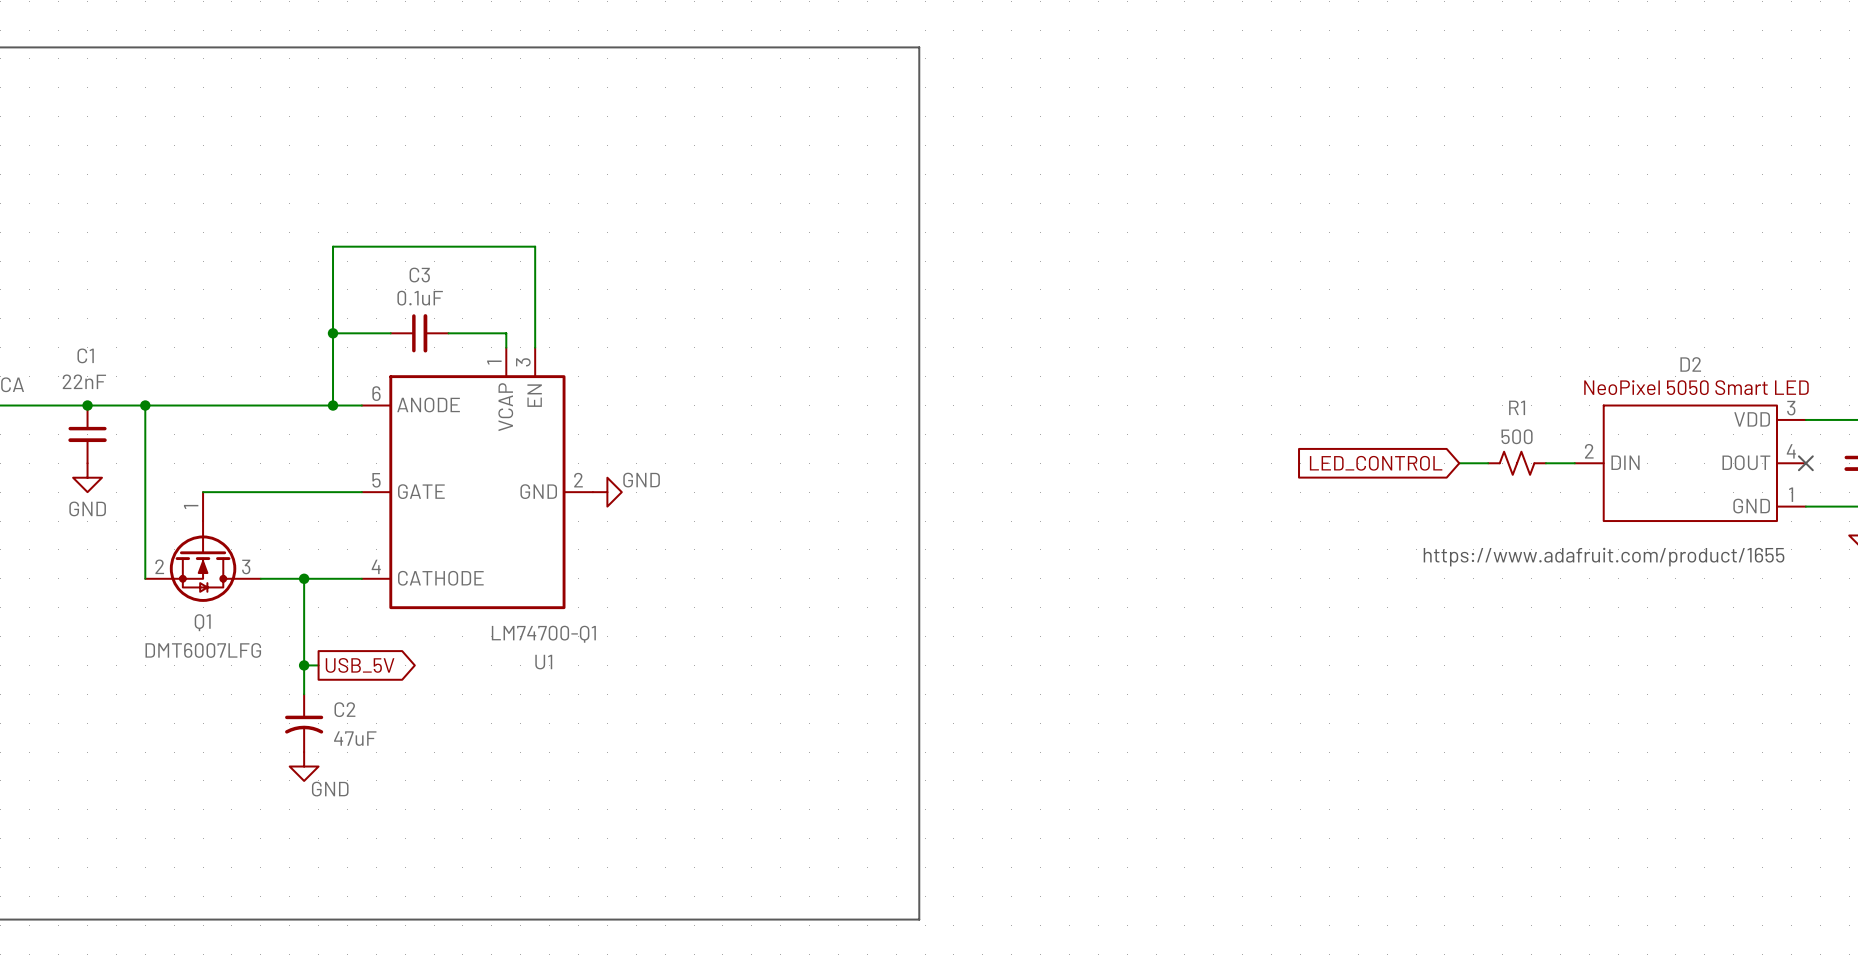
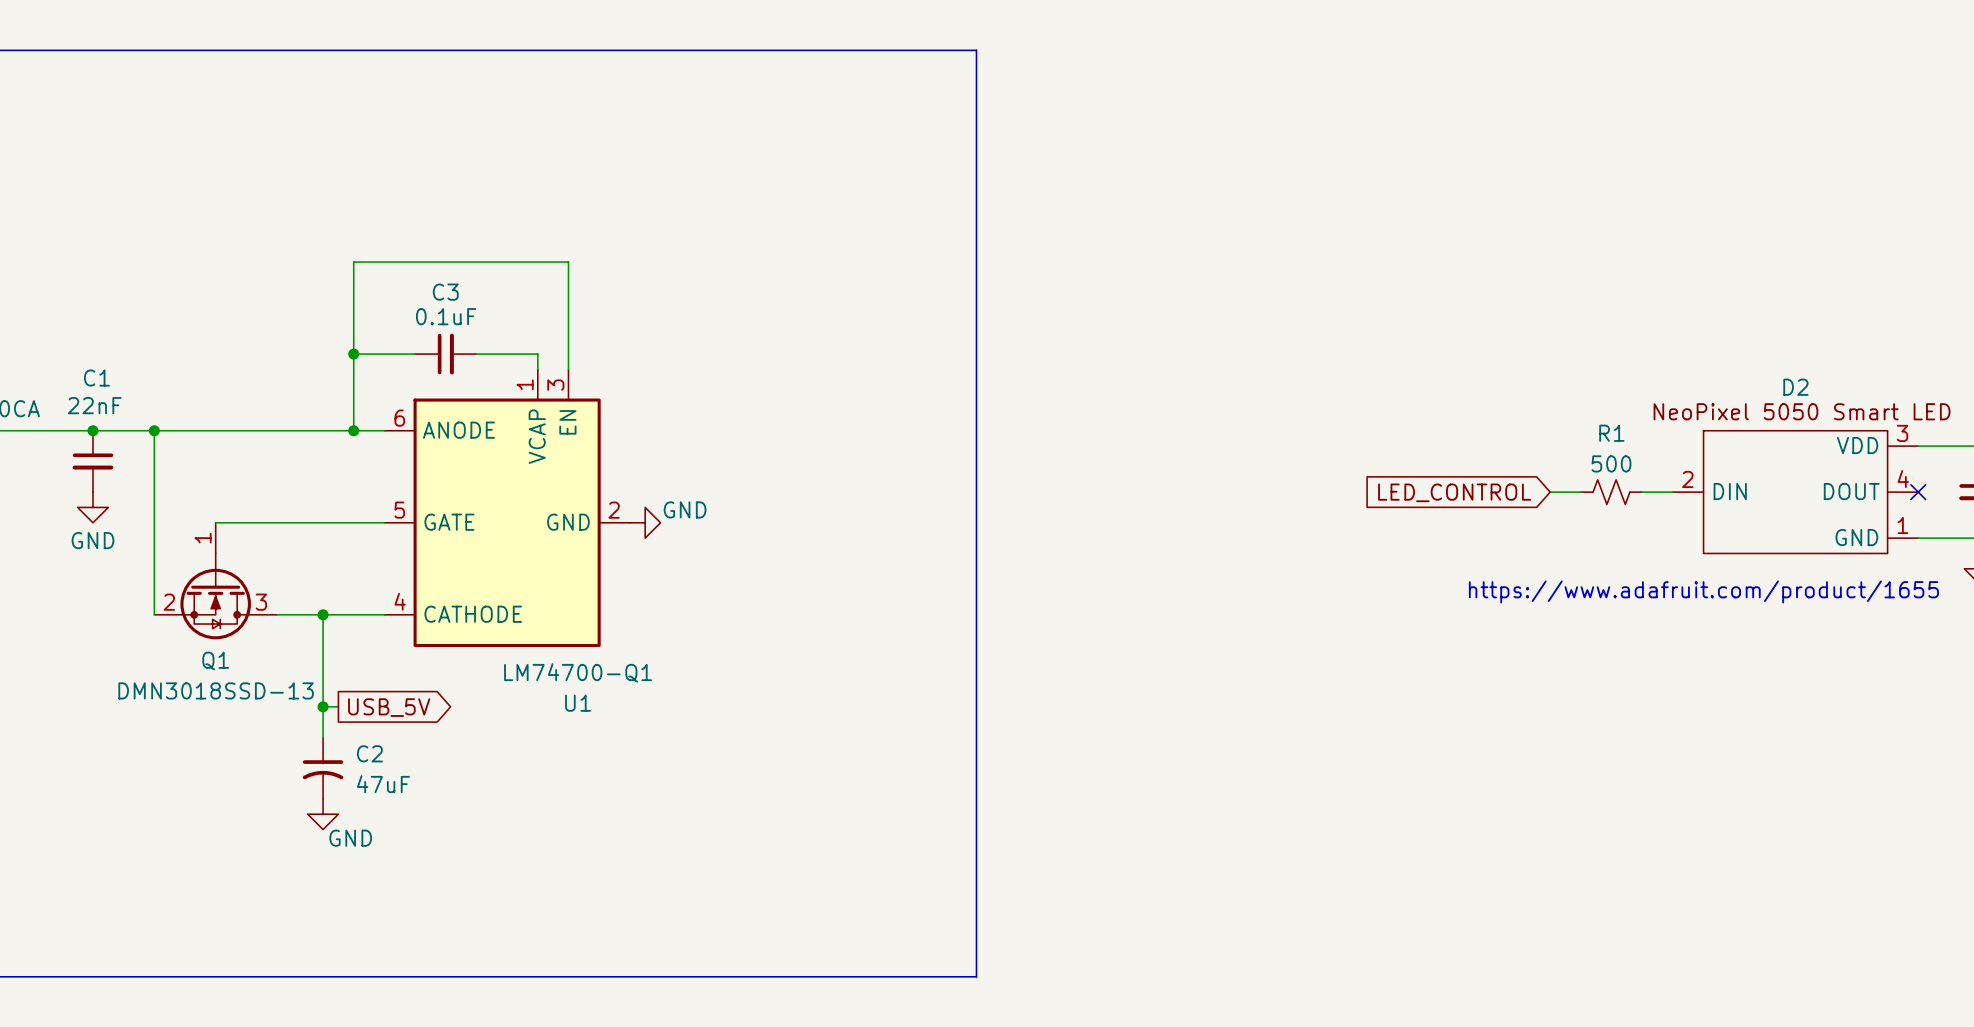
Q1 value: DMT6007LFG (203, 650) -> DMN3018SSD-13 (216, 690)

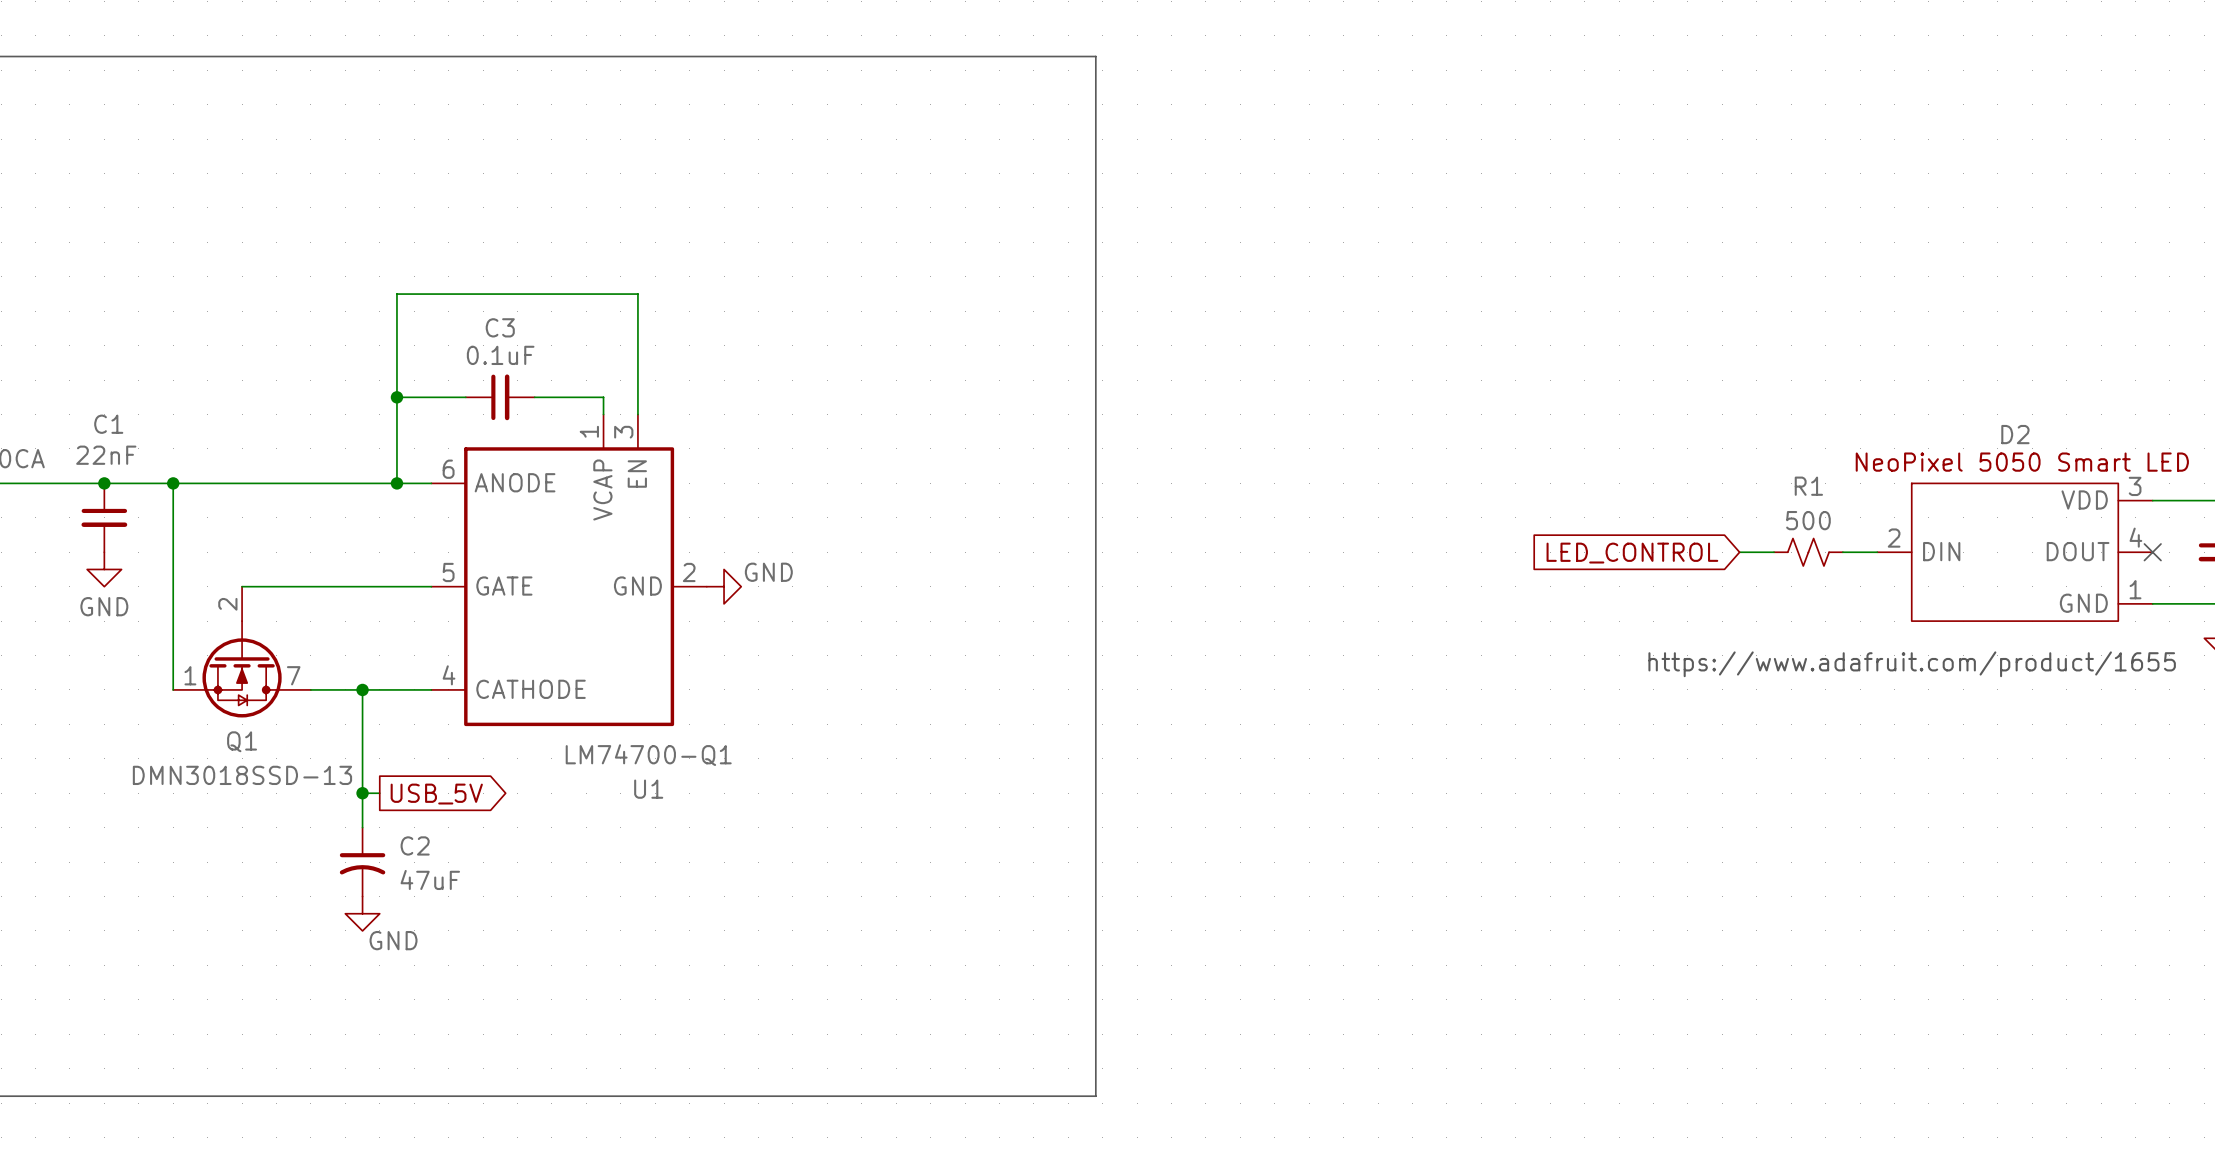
Q1 pin number: 1 (203, 538) -> 2 (227, 604)
Q1 pin number: 2 (169, 602) -> 1 (190, 675)
Q1 pin number: 3 (261, 602) -> 7 (293, 675)

